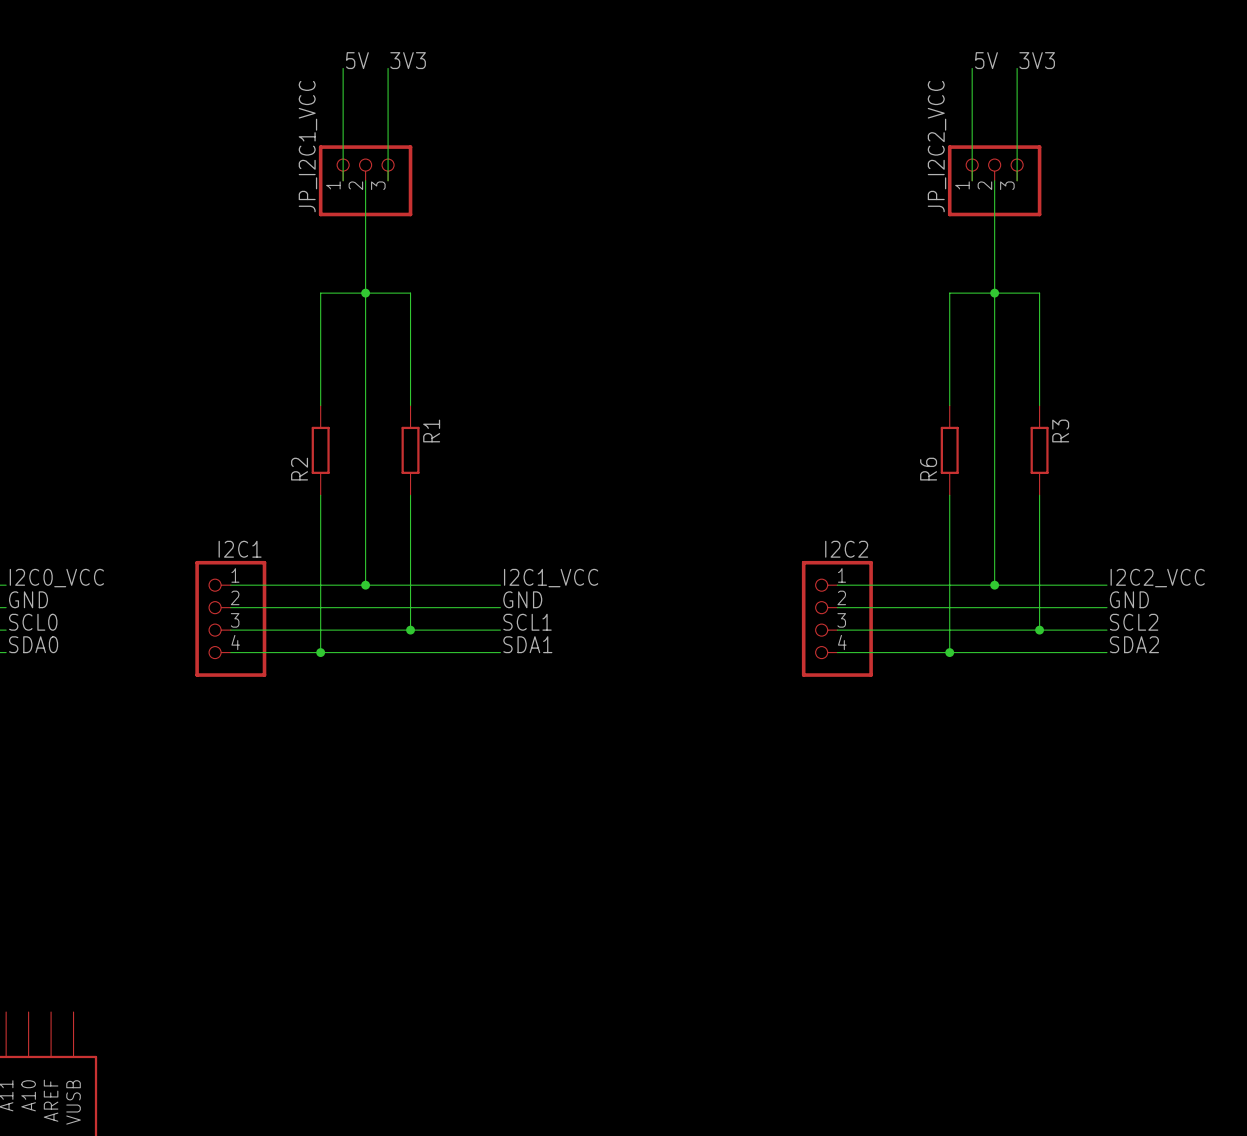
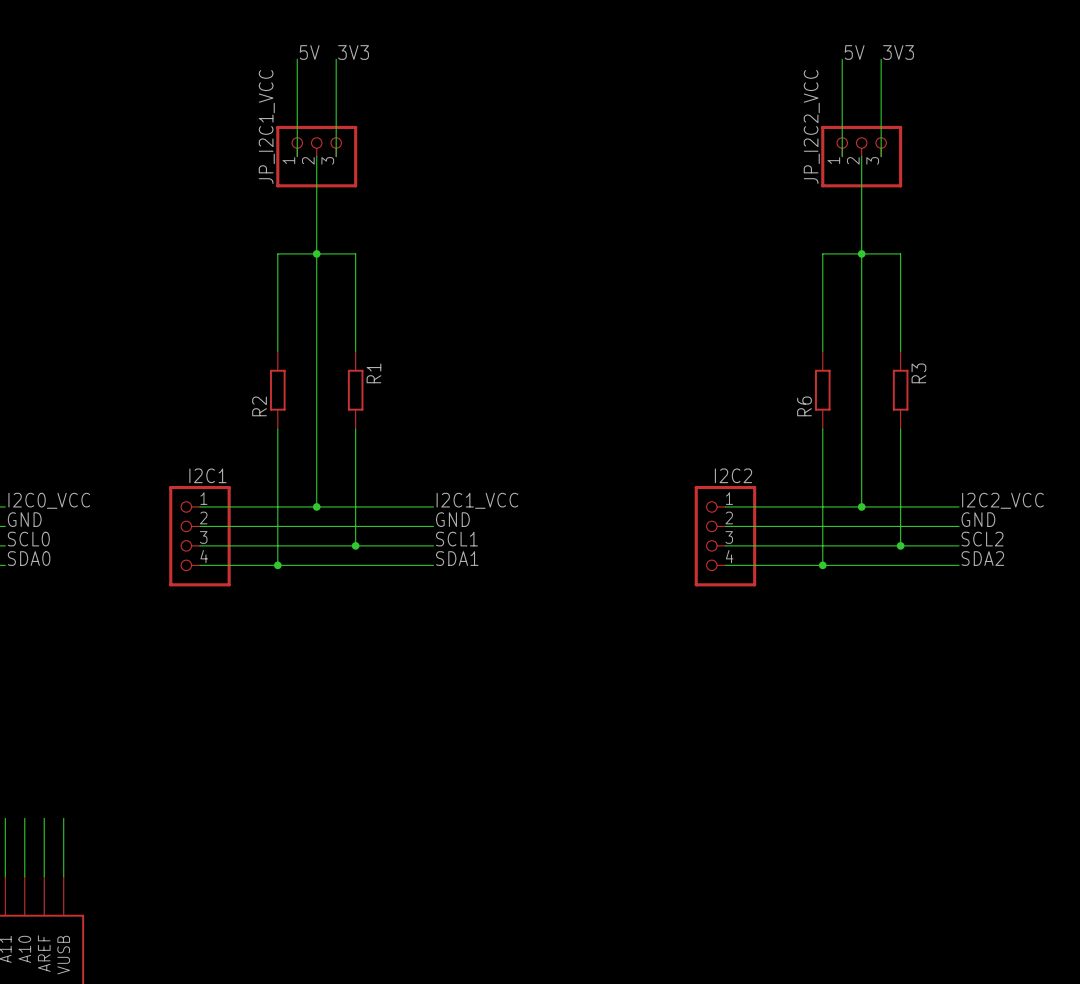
wire: none -> (5, 818) (5, 876)
wire: none -> (24, 818) (24, 876)
wire: none -> (44, 818) (44, 876)
wire: none -> (63, 818) (63, 876)

